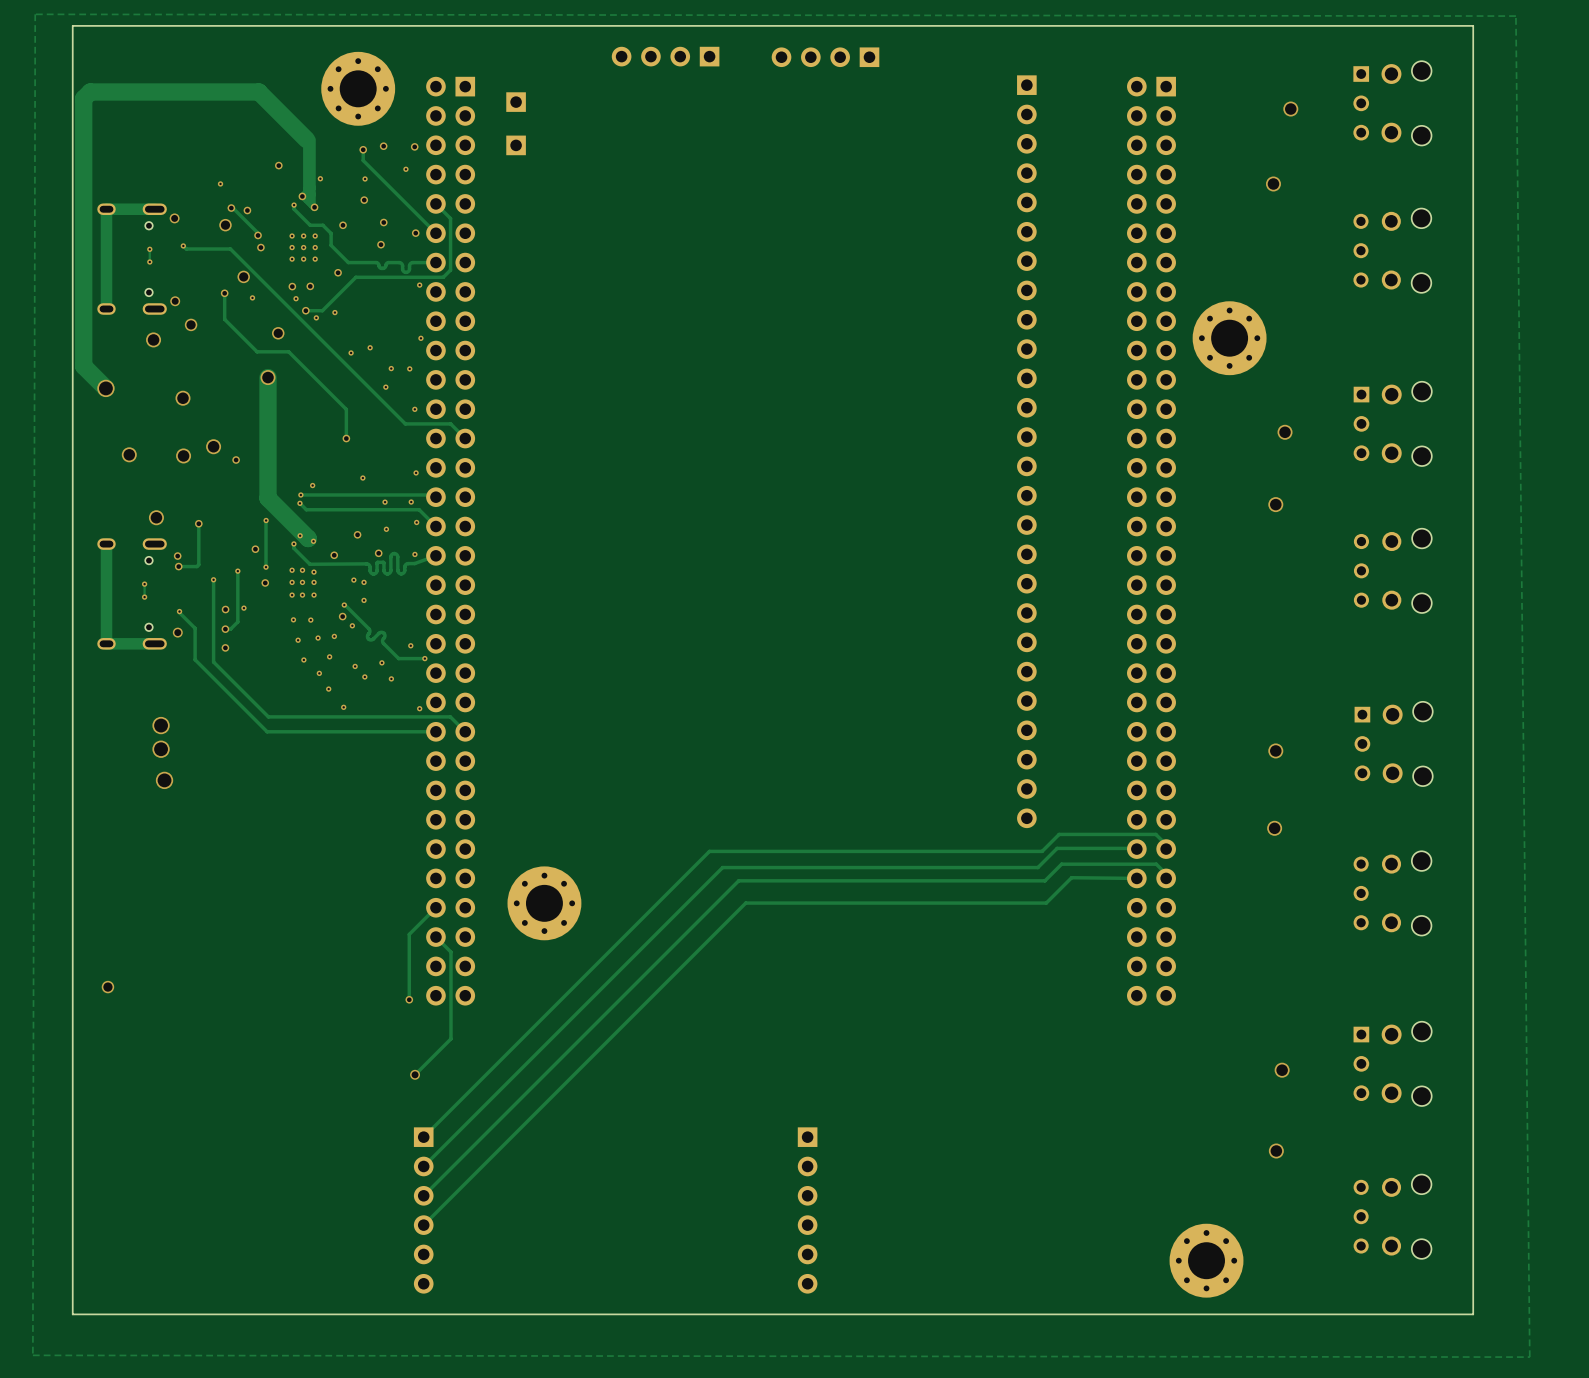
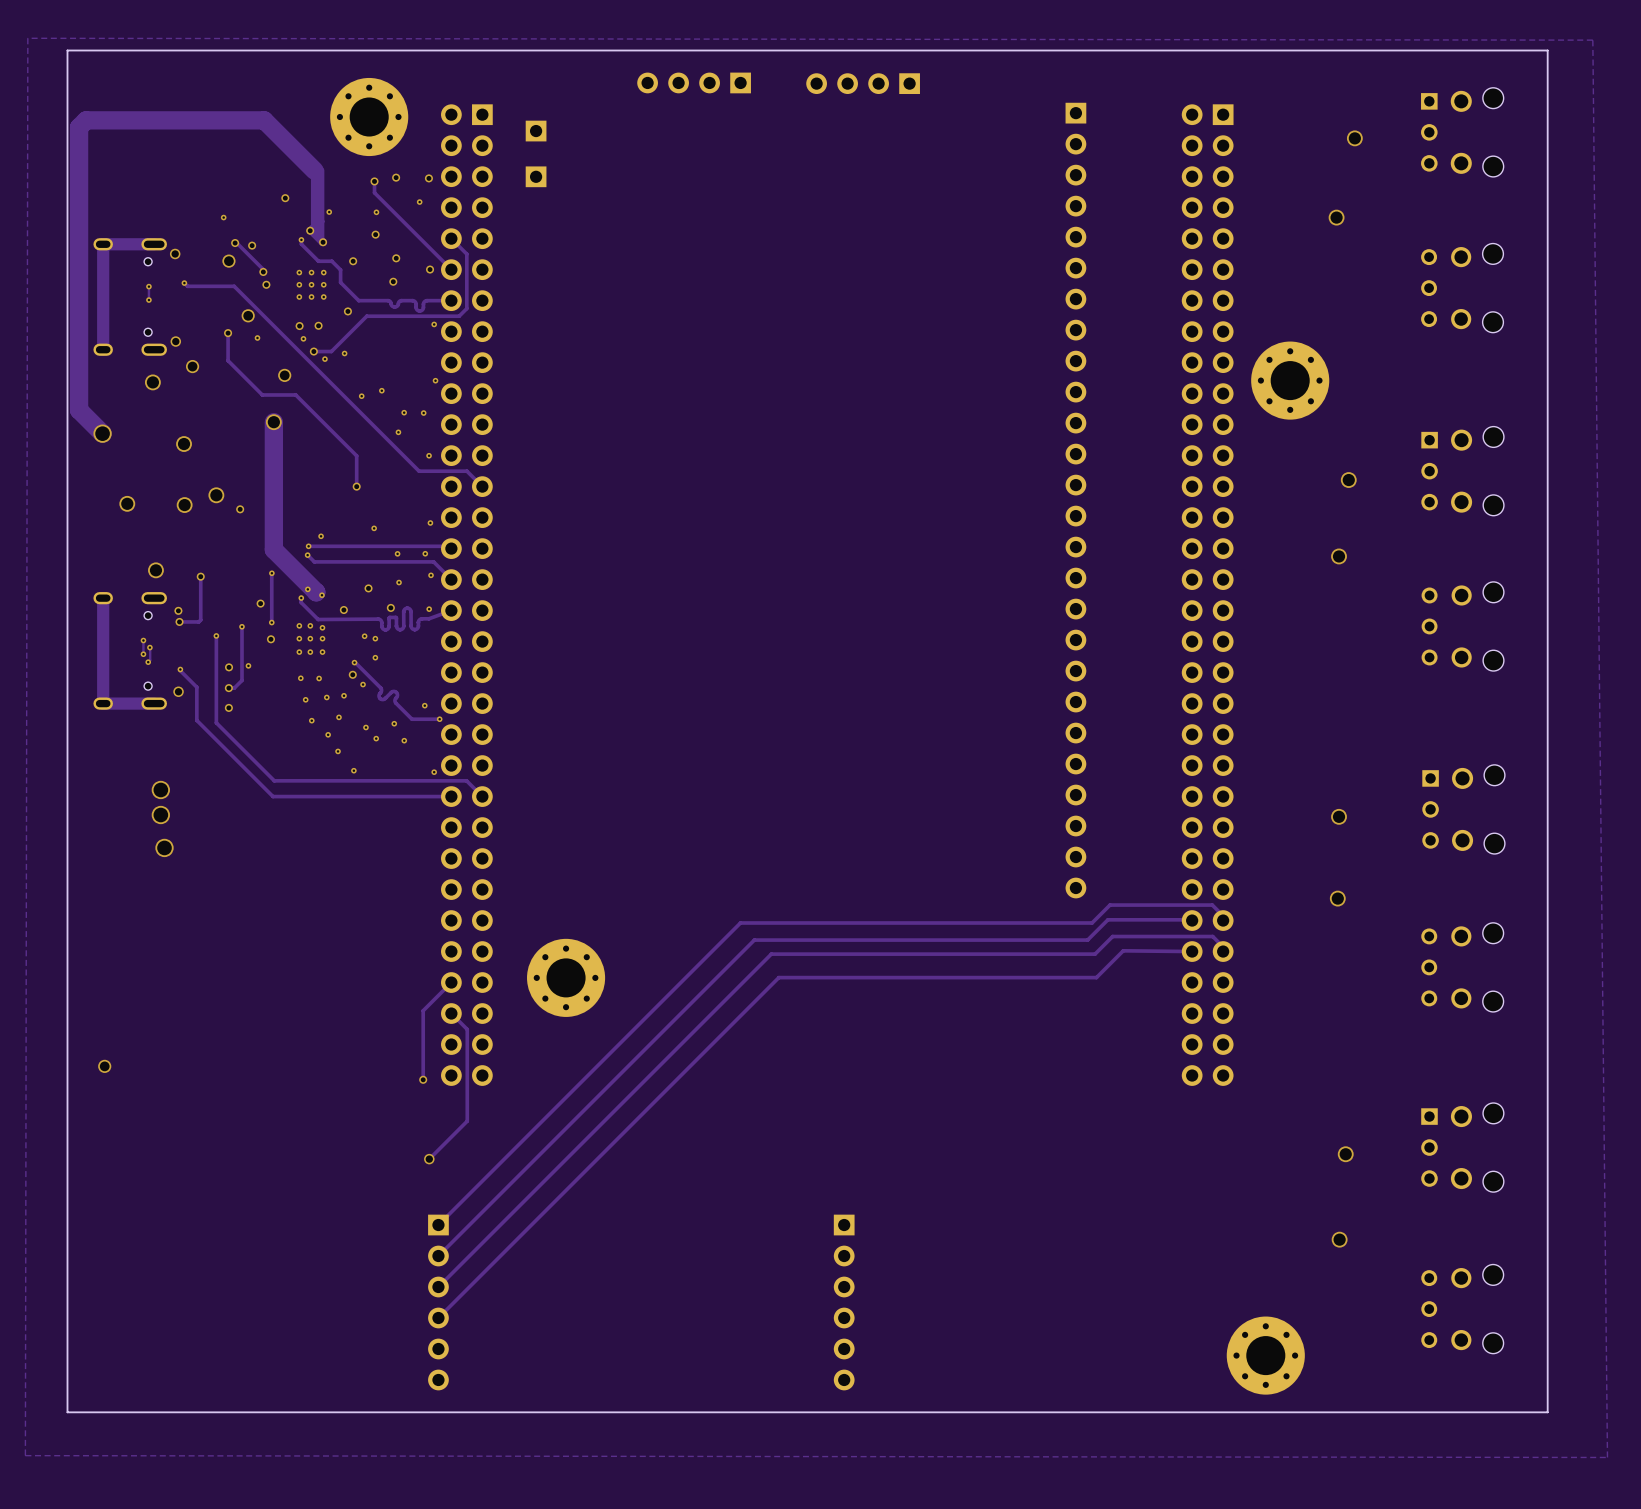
track: none -> (149, 647) (150, 660) (148, 662)
via: none -> (149, 647)
via: none -> (148, 662)

